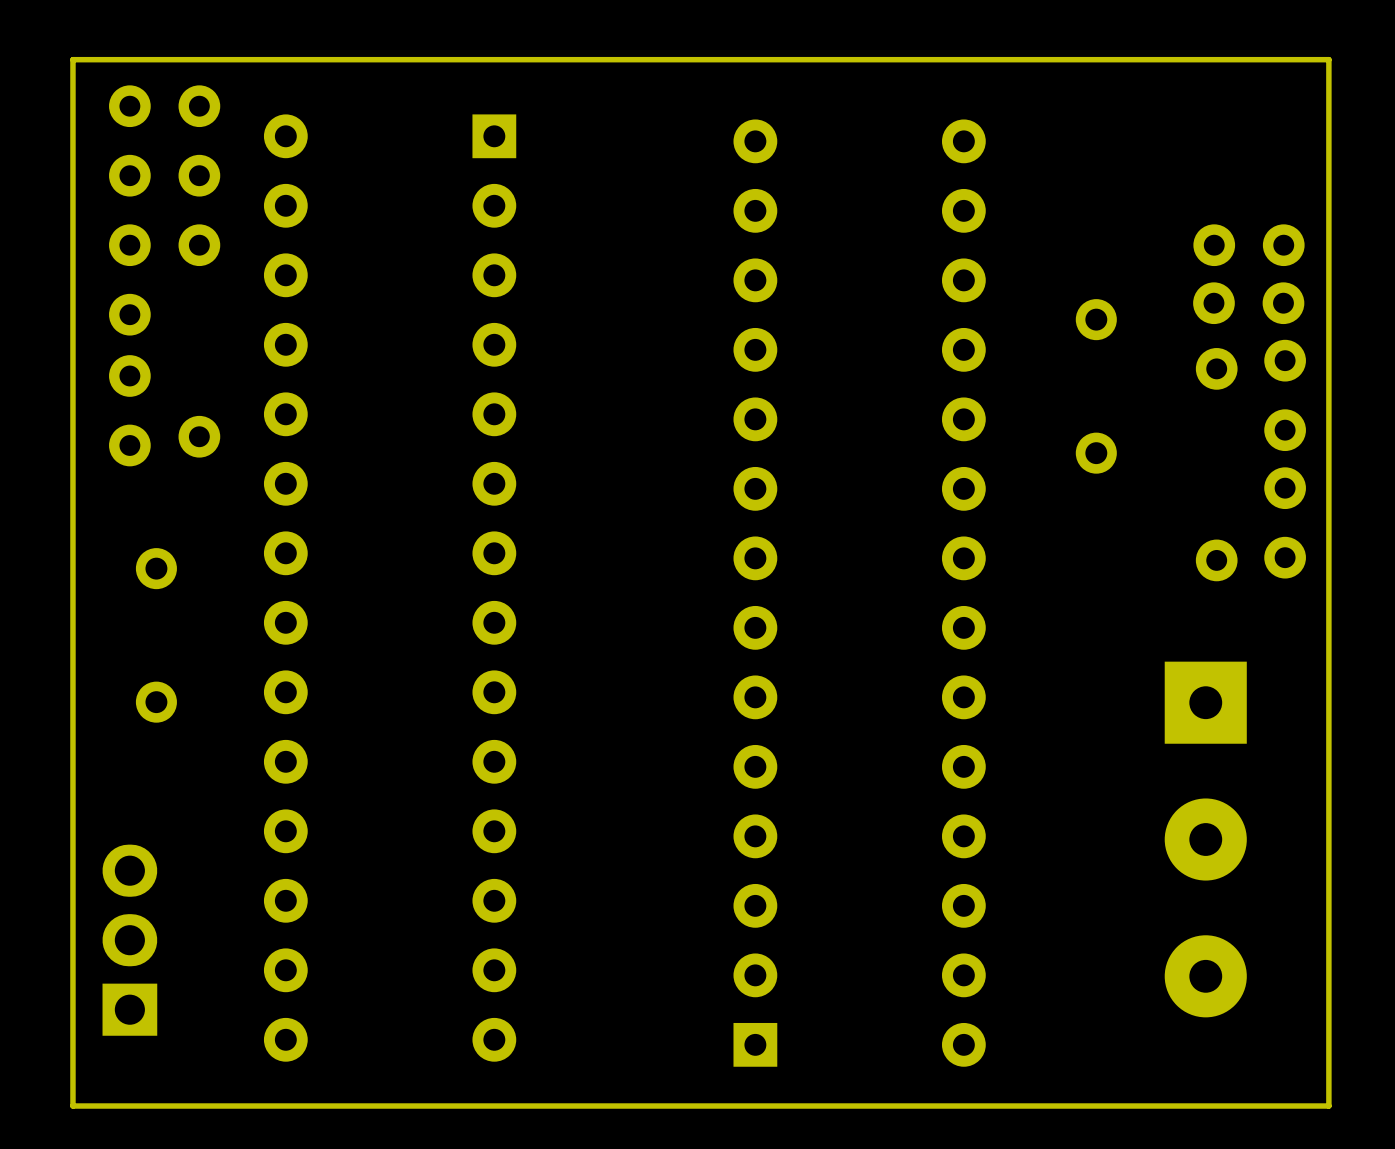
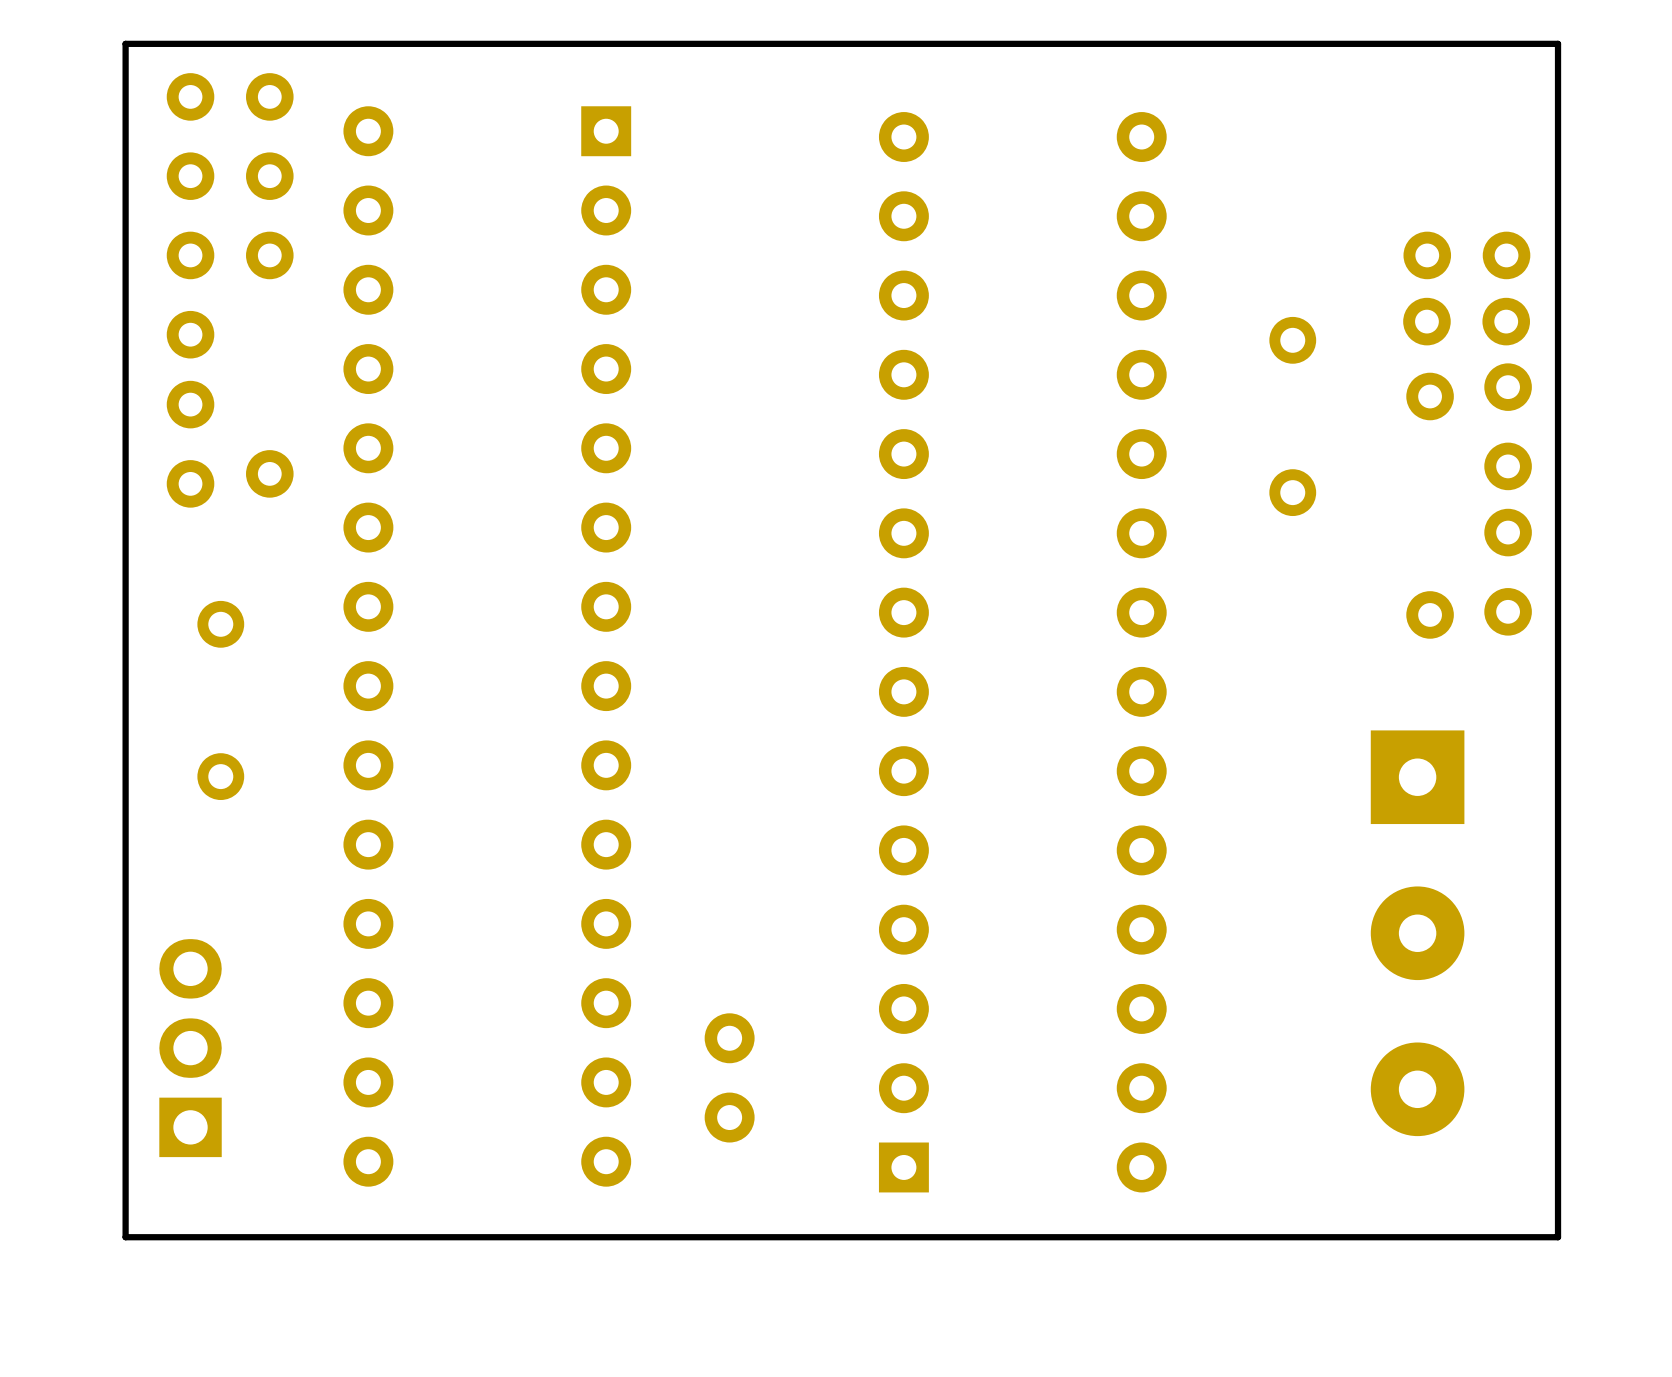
part: none -> (729, 1077)

